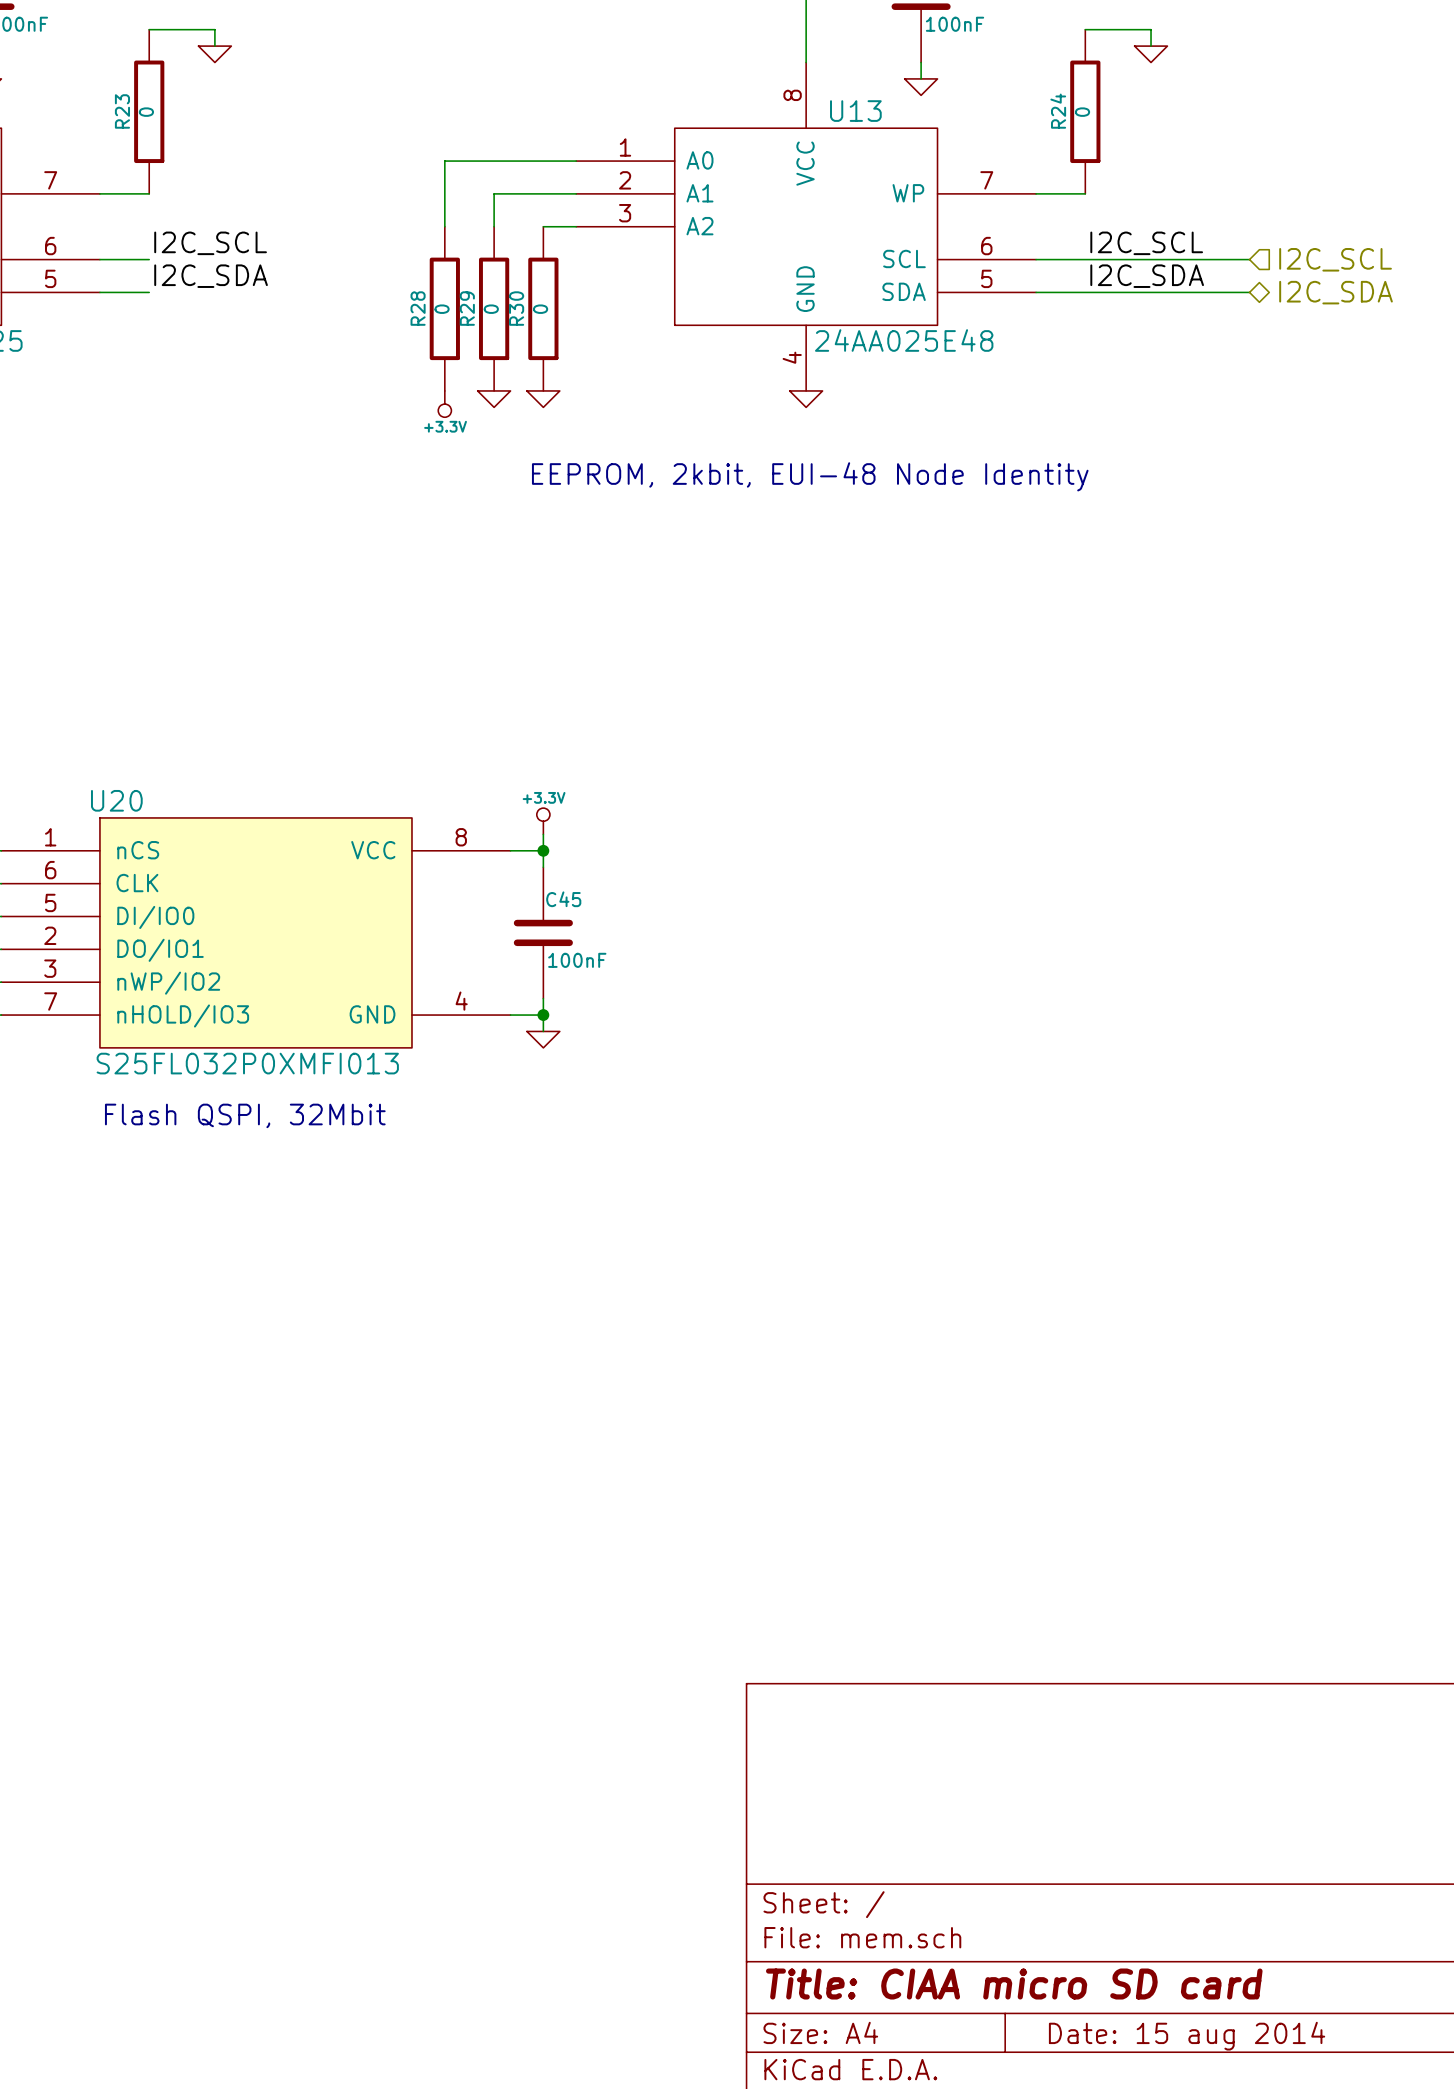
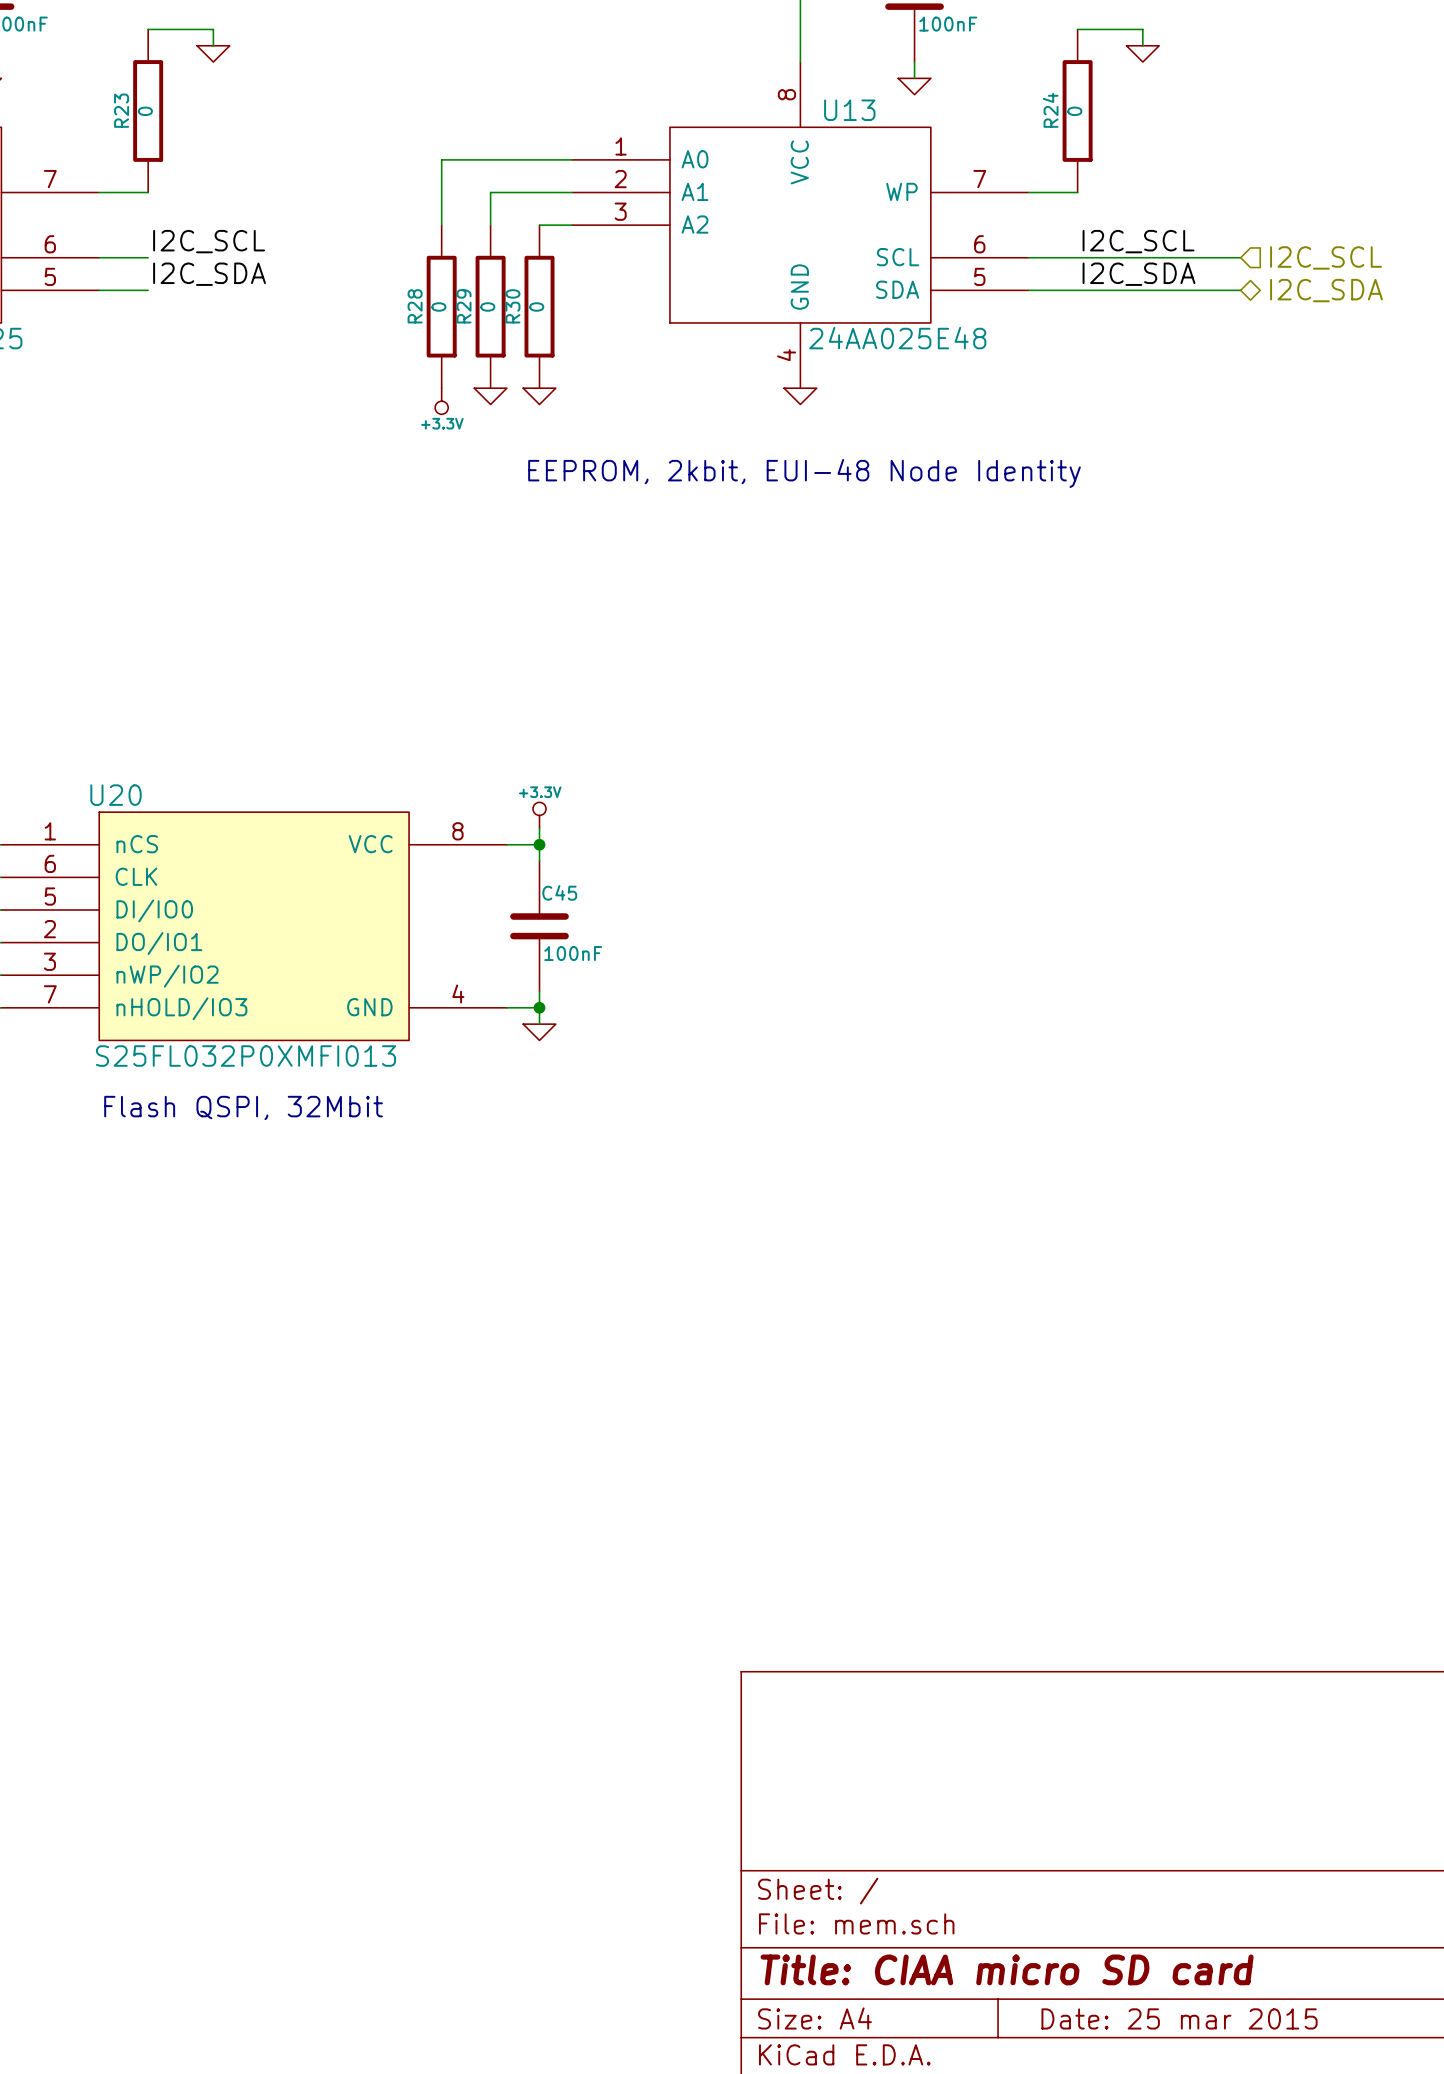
title block: Date: 15 aug 2014 (1187, 2036) -> Date: 25 mar 2015 (1179, 2018)

